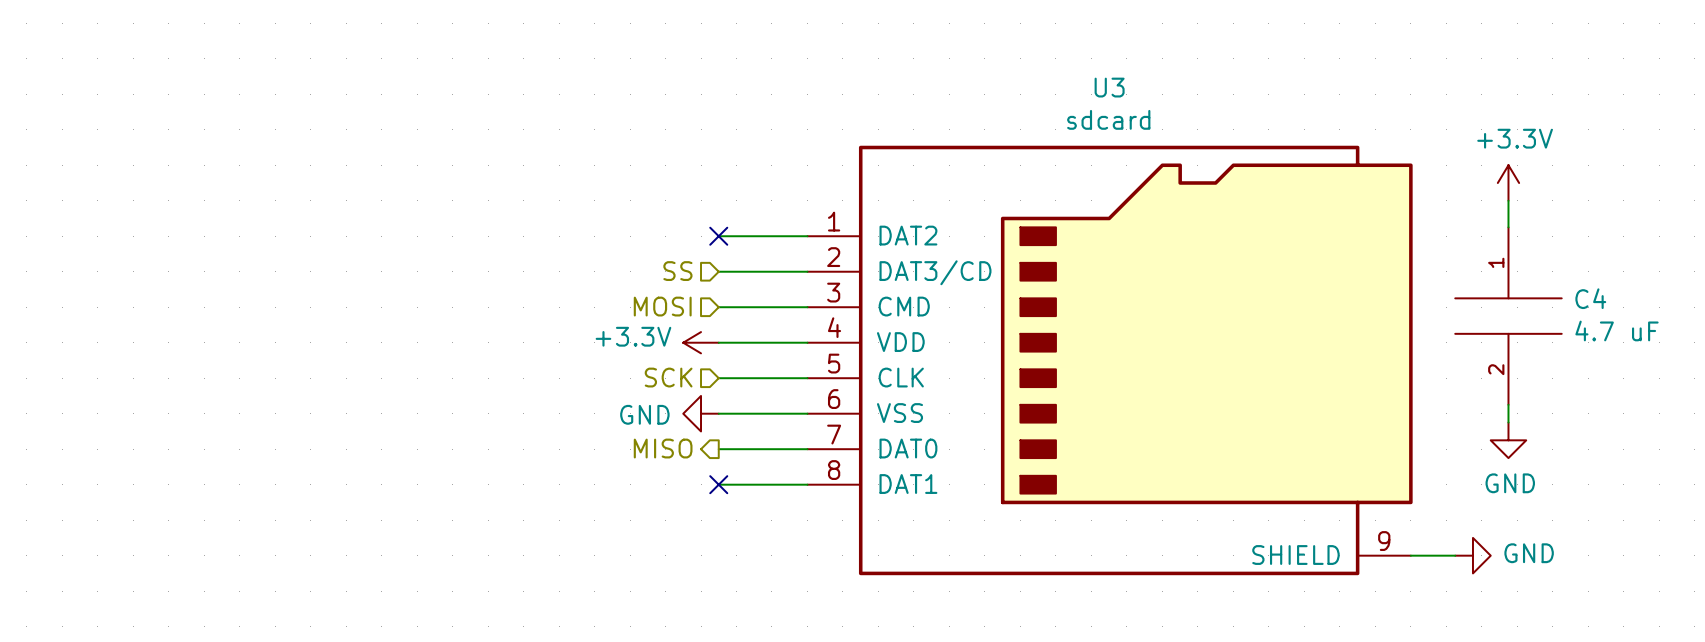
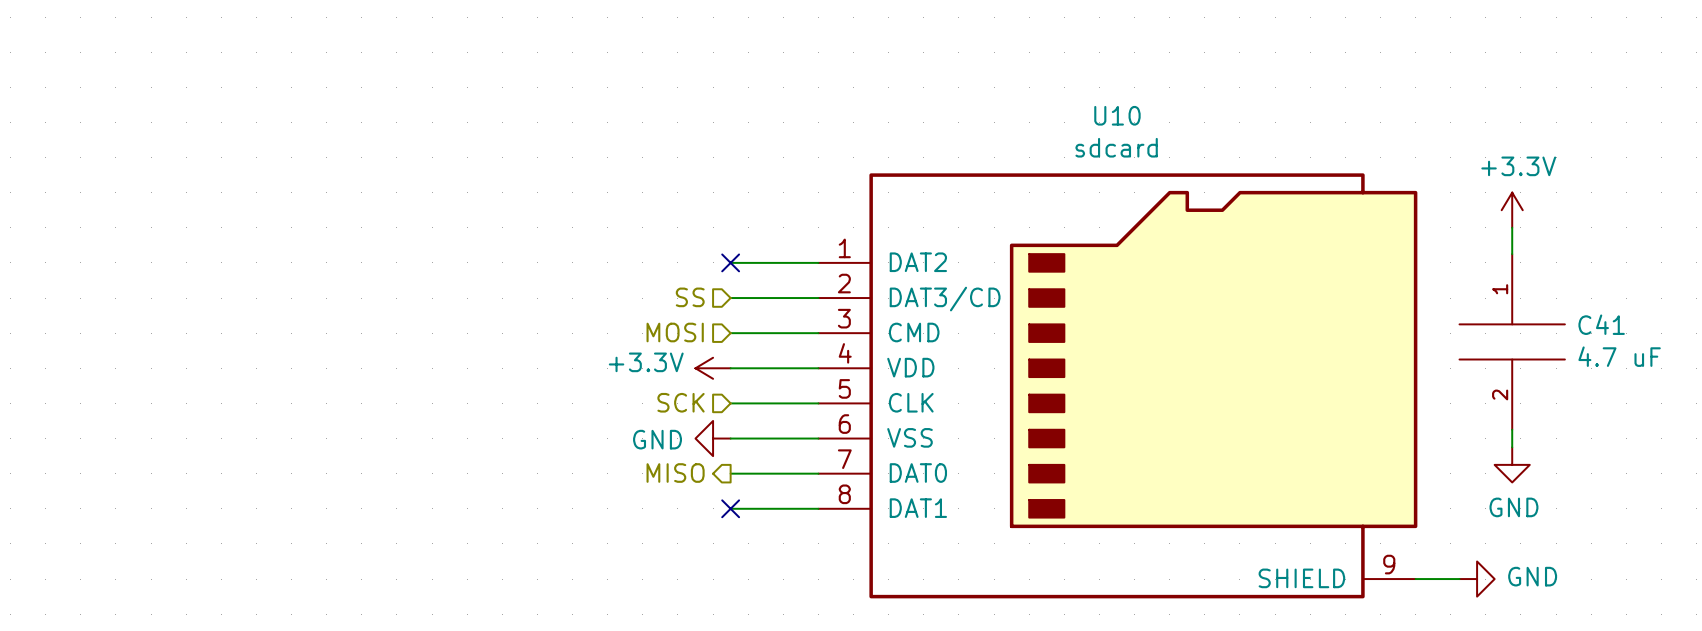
U3 name: U3 (1109, 87) -> U10 (1117, 115)
C4 name: C4 (1590, 298) -> C41 (1601, 324)

